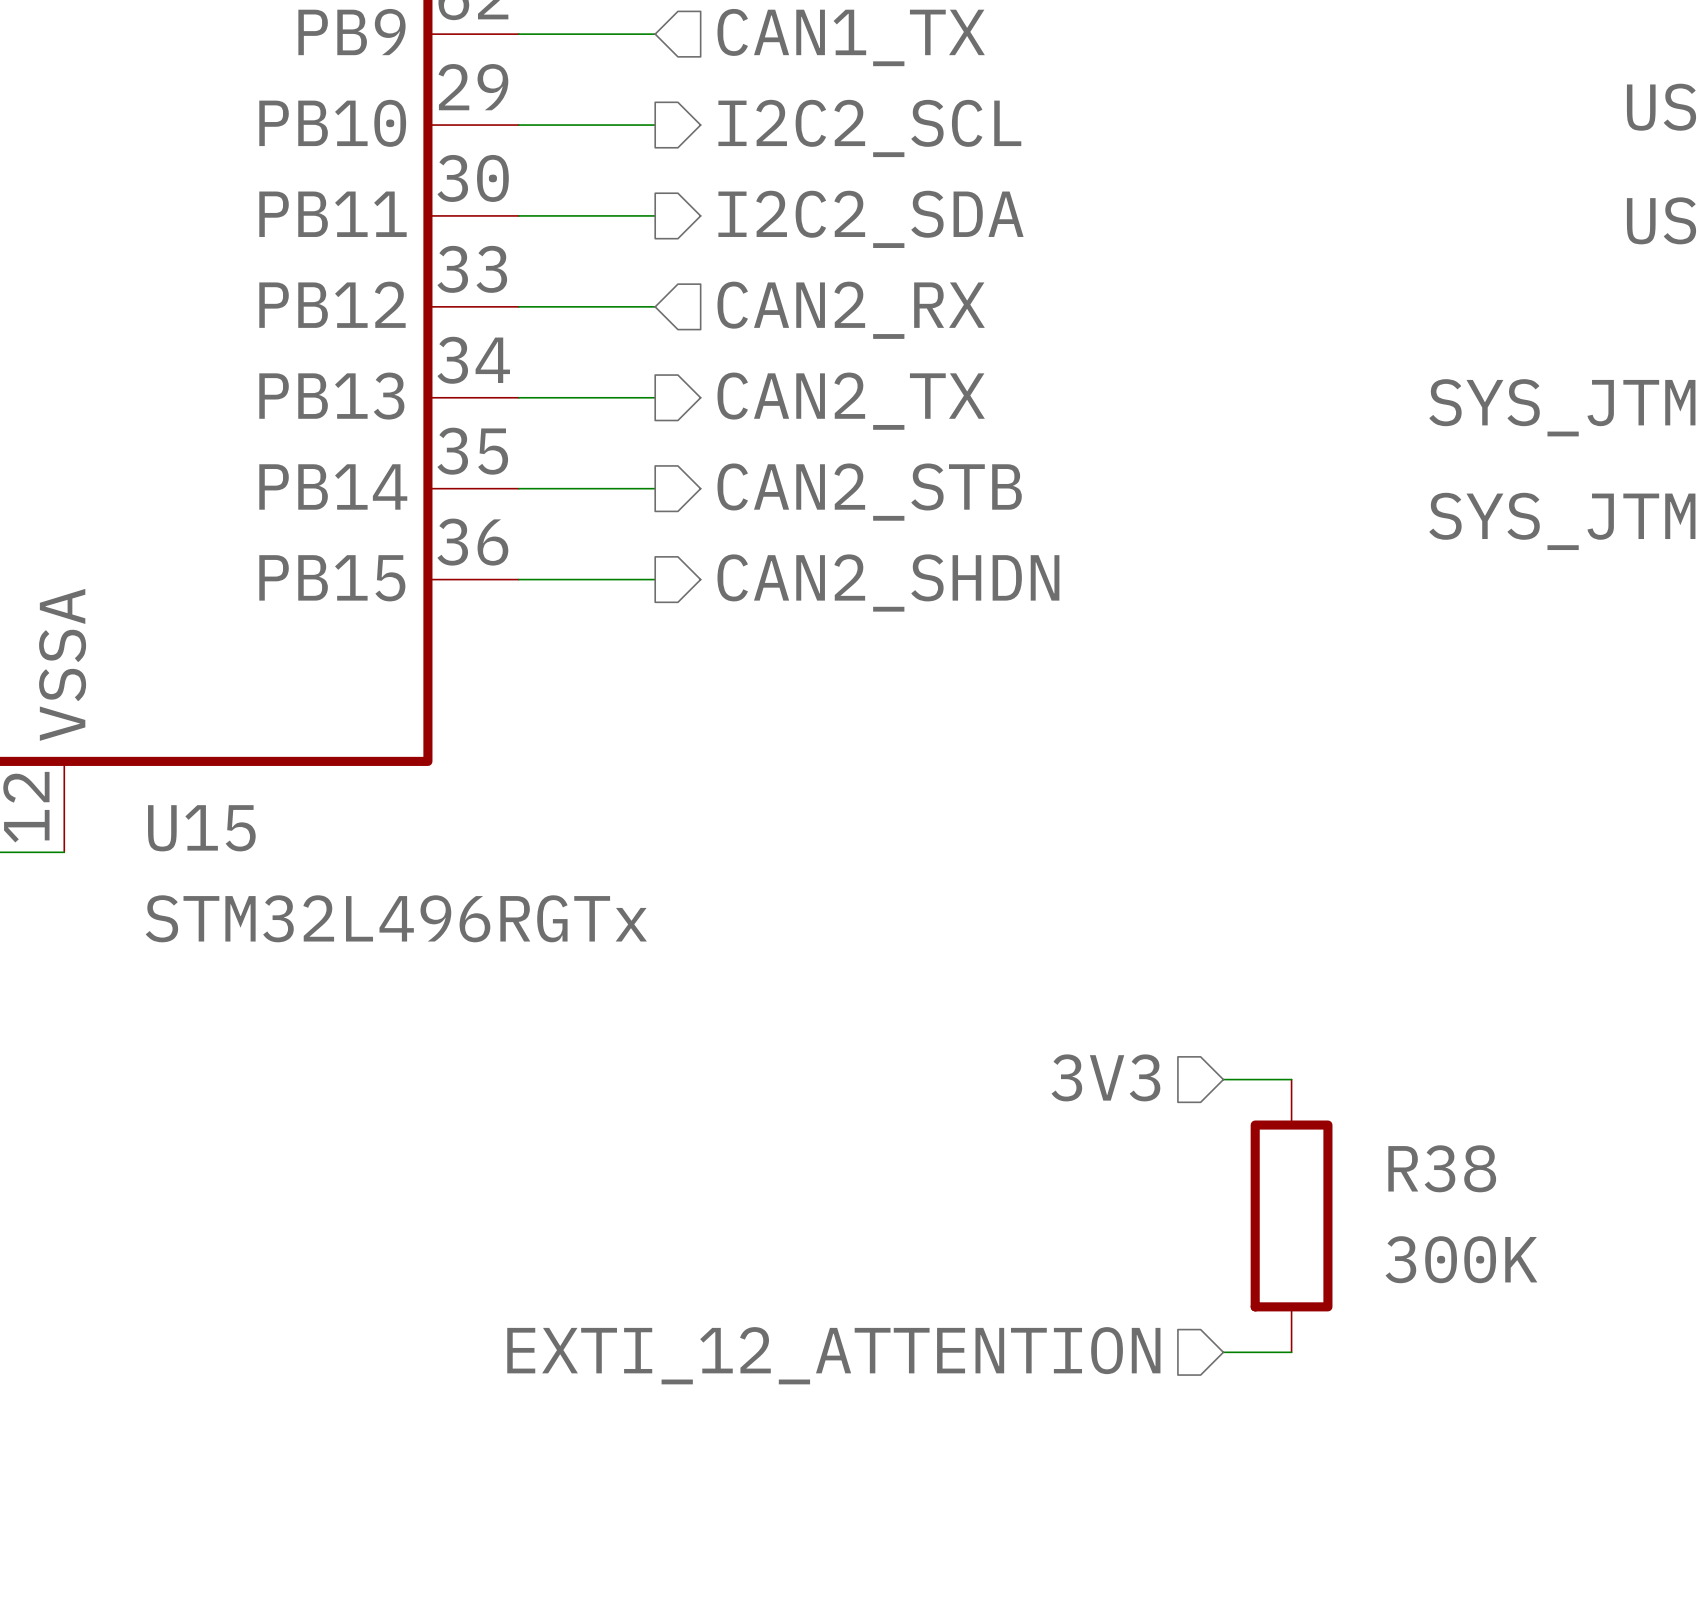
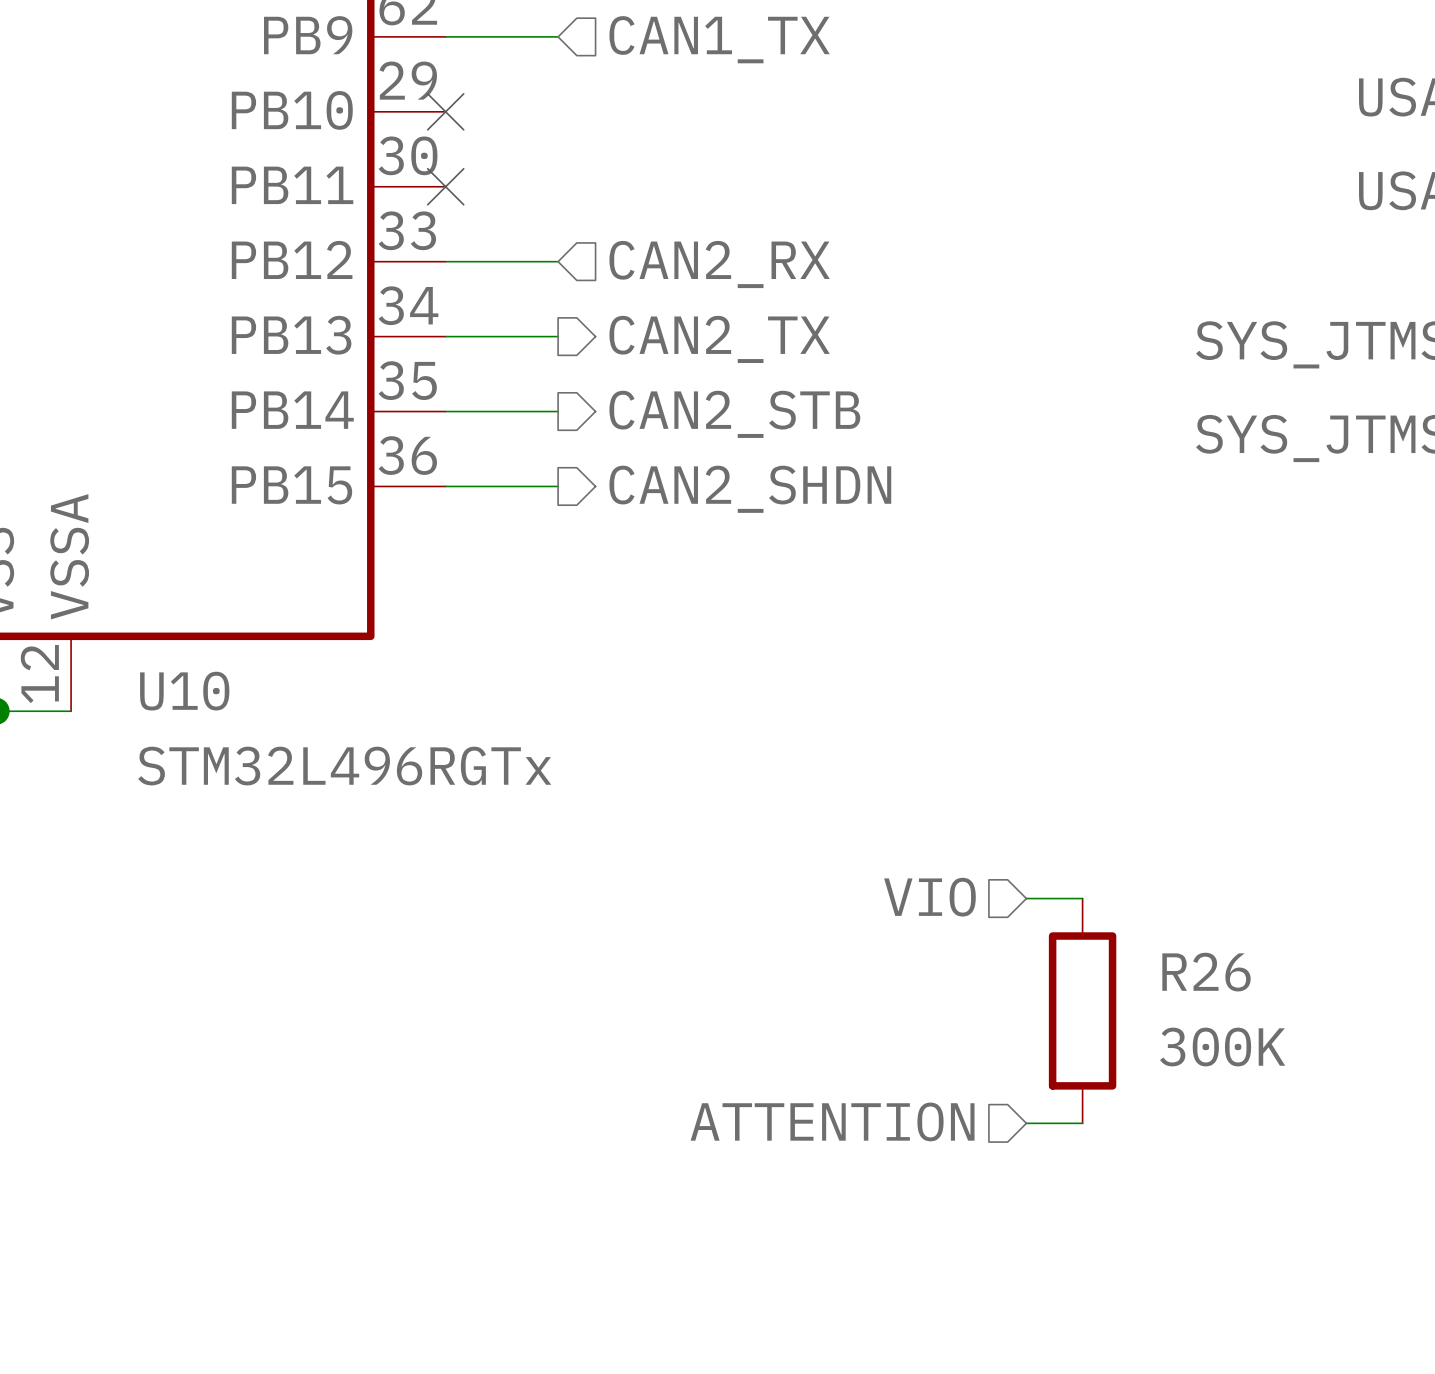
wire: (518, 125) (655, 125) -> none
no-connect mark: none -> (445, 111)
hierarchical label: I2C2_SCL (869, 128) -> none
wire: (518, 215) (655, 215) -> none
no-connect mark: none -> (445, 186)
hierarchical label: I2C2_SDA (870, 219) -> none
U15 name: U15 (201, 828) -> U10 (184, 691)
hierarchical label: 3V3 (1105, 1077) -> VIO (929, 897)
R38 name: R38 (1442, 1168) -> R26 (1206, 972)
hierarchical label: EXTI_12_ATTENTION (833, 1355) -> ATTENTION (832, 1121)

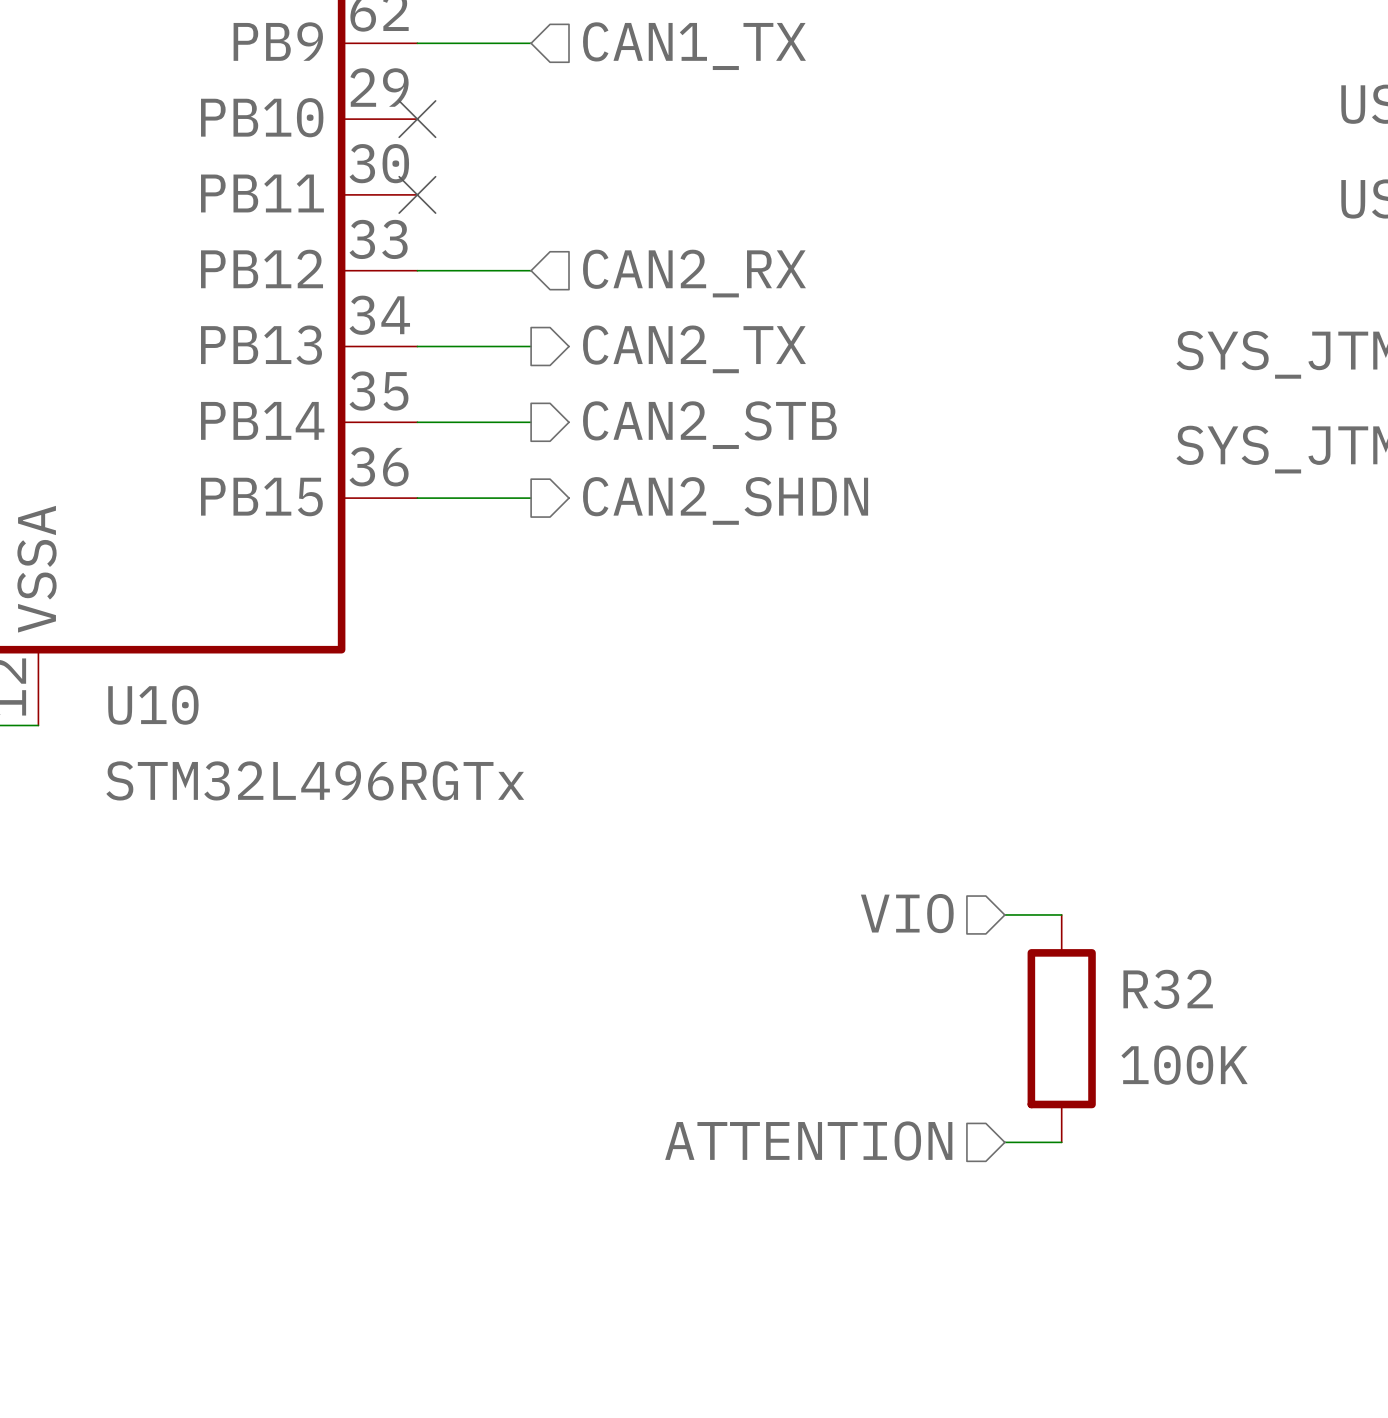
R26 name: R26 (1206, 972) -> R32 (1168, 989)
R26 value: 300K (1222, 1047) -> 100K (1184, 1065)

